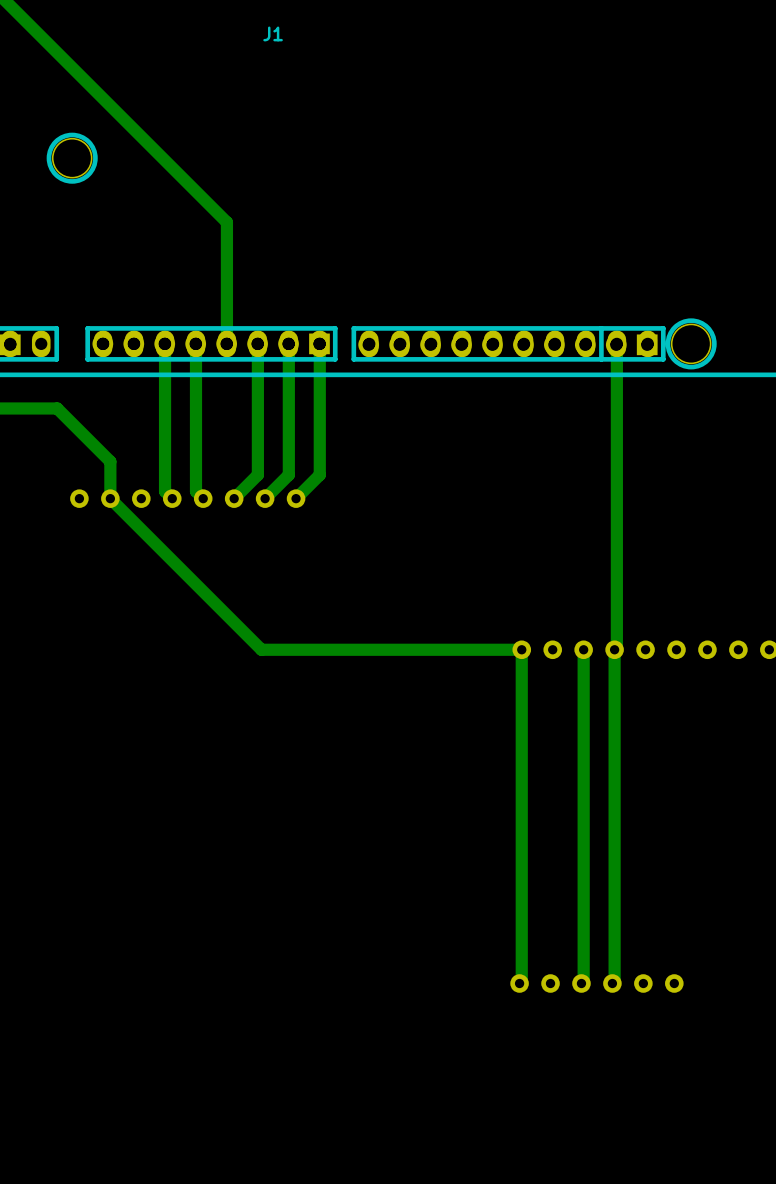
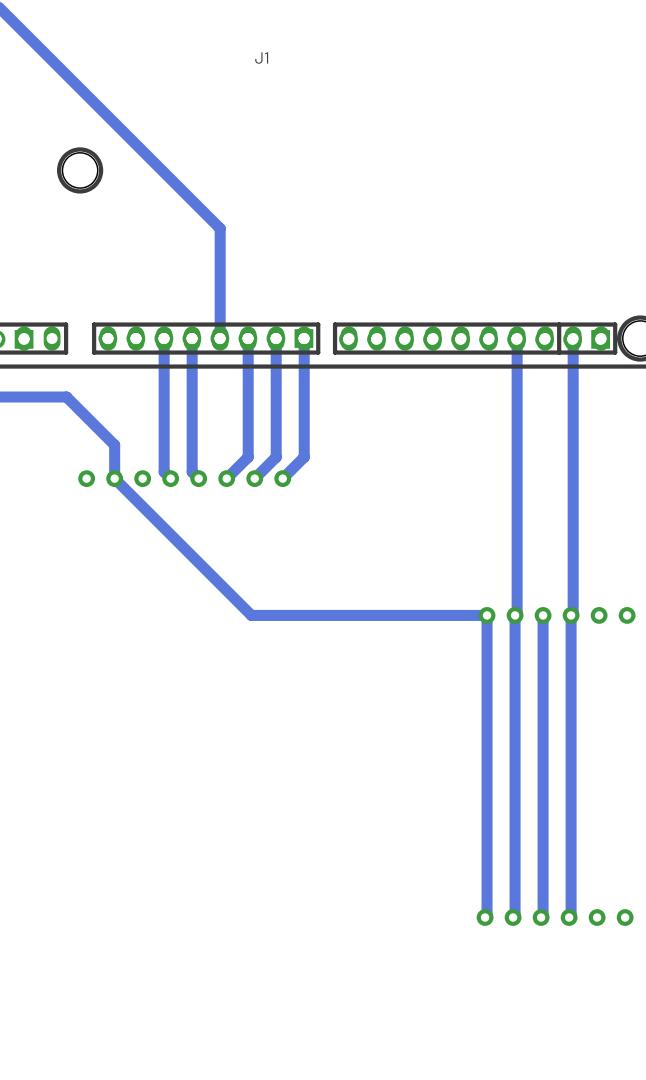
track: none -> (517, 338) (517, 613)
track: none -> (515, 615) (515, 915)

